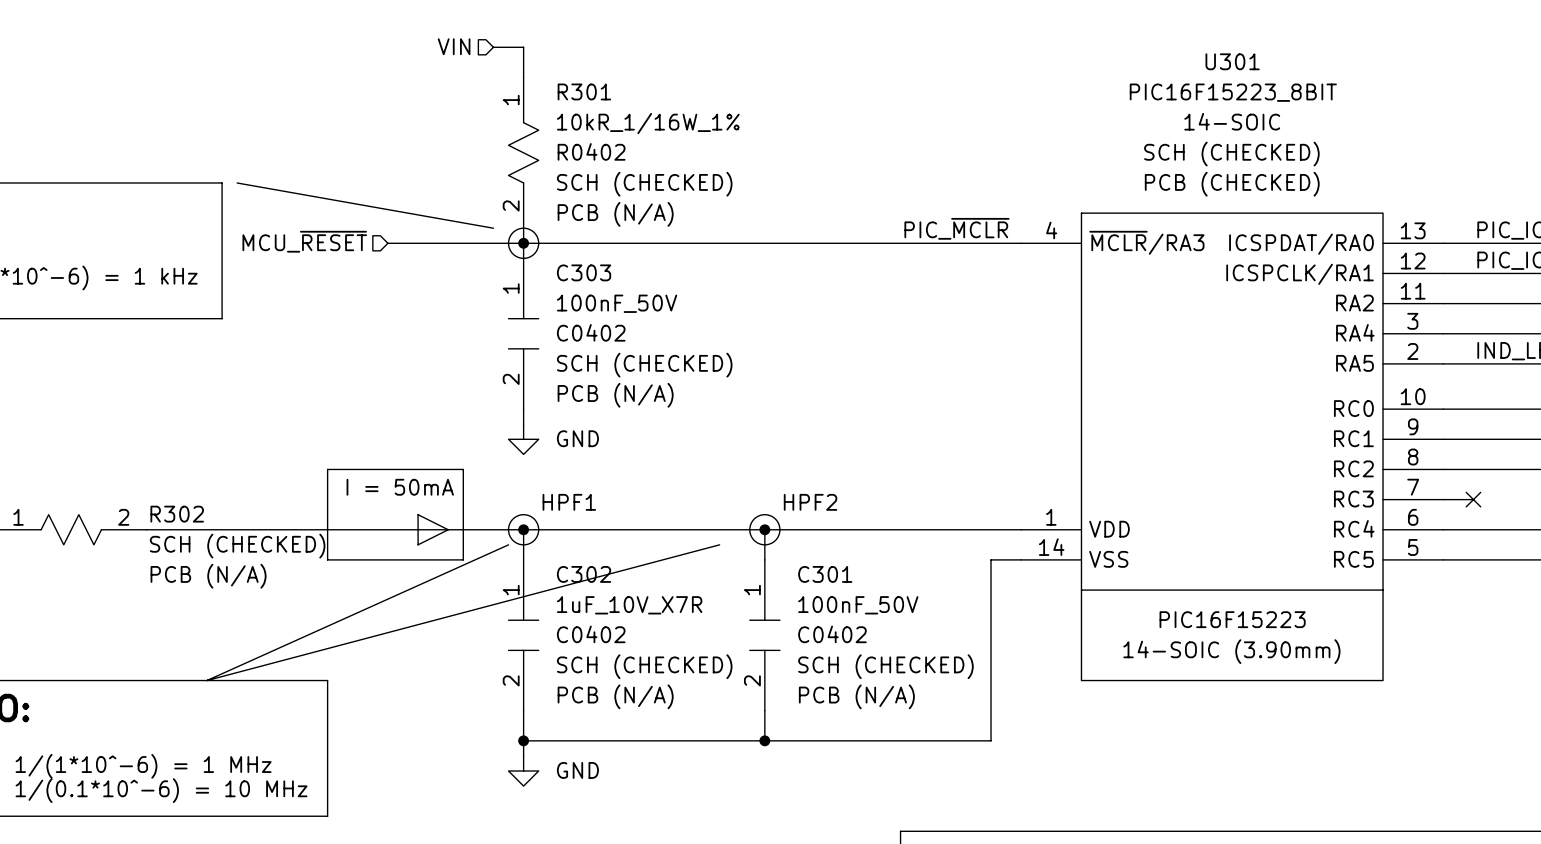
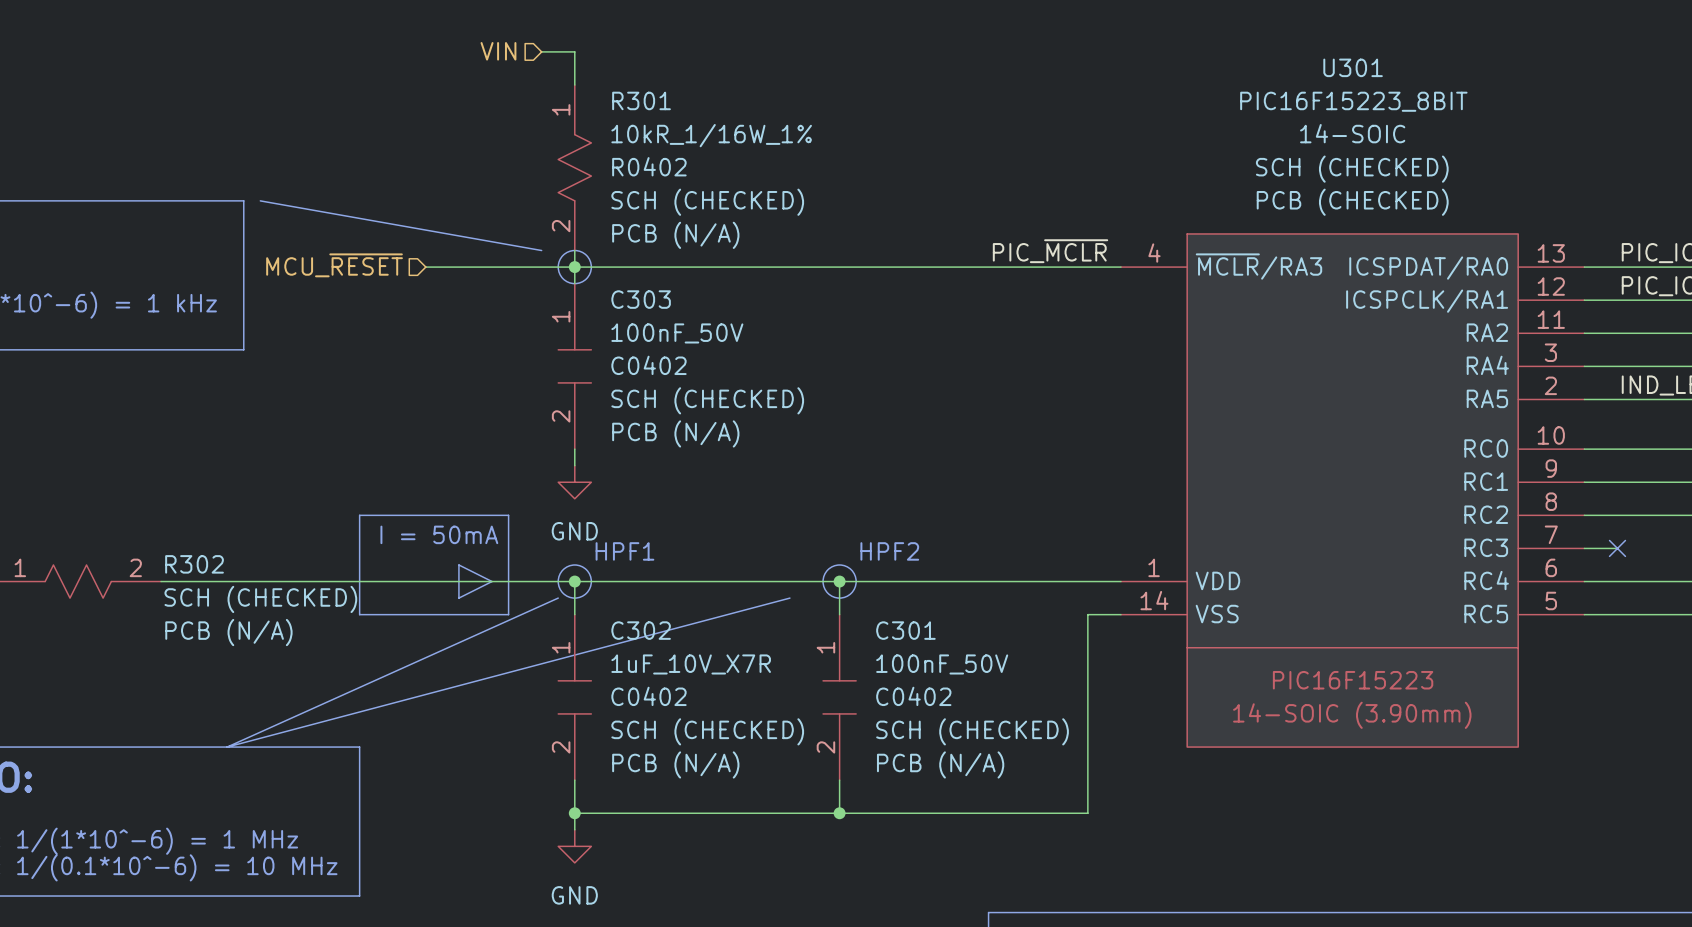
power symbol text position: GND (577, 438) -> GND (574, 531)
power symbol text position: GND (577, 770) -> GND (574, 895)

